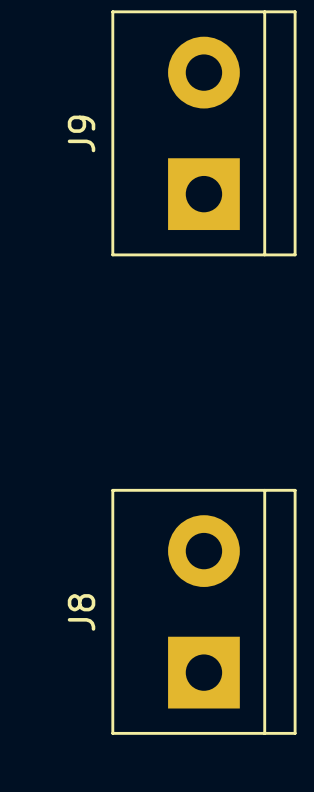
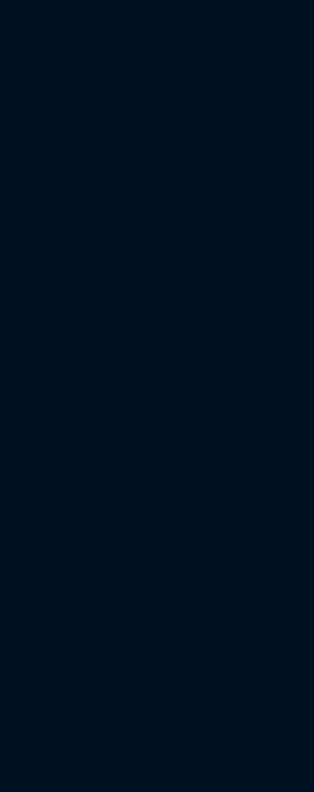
J9: (203, 133) -> none
J8: (203, 611) -> none

